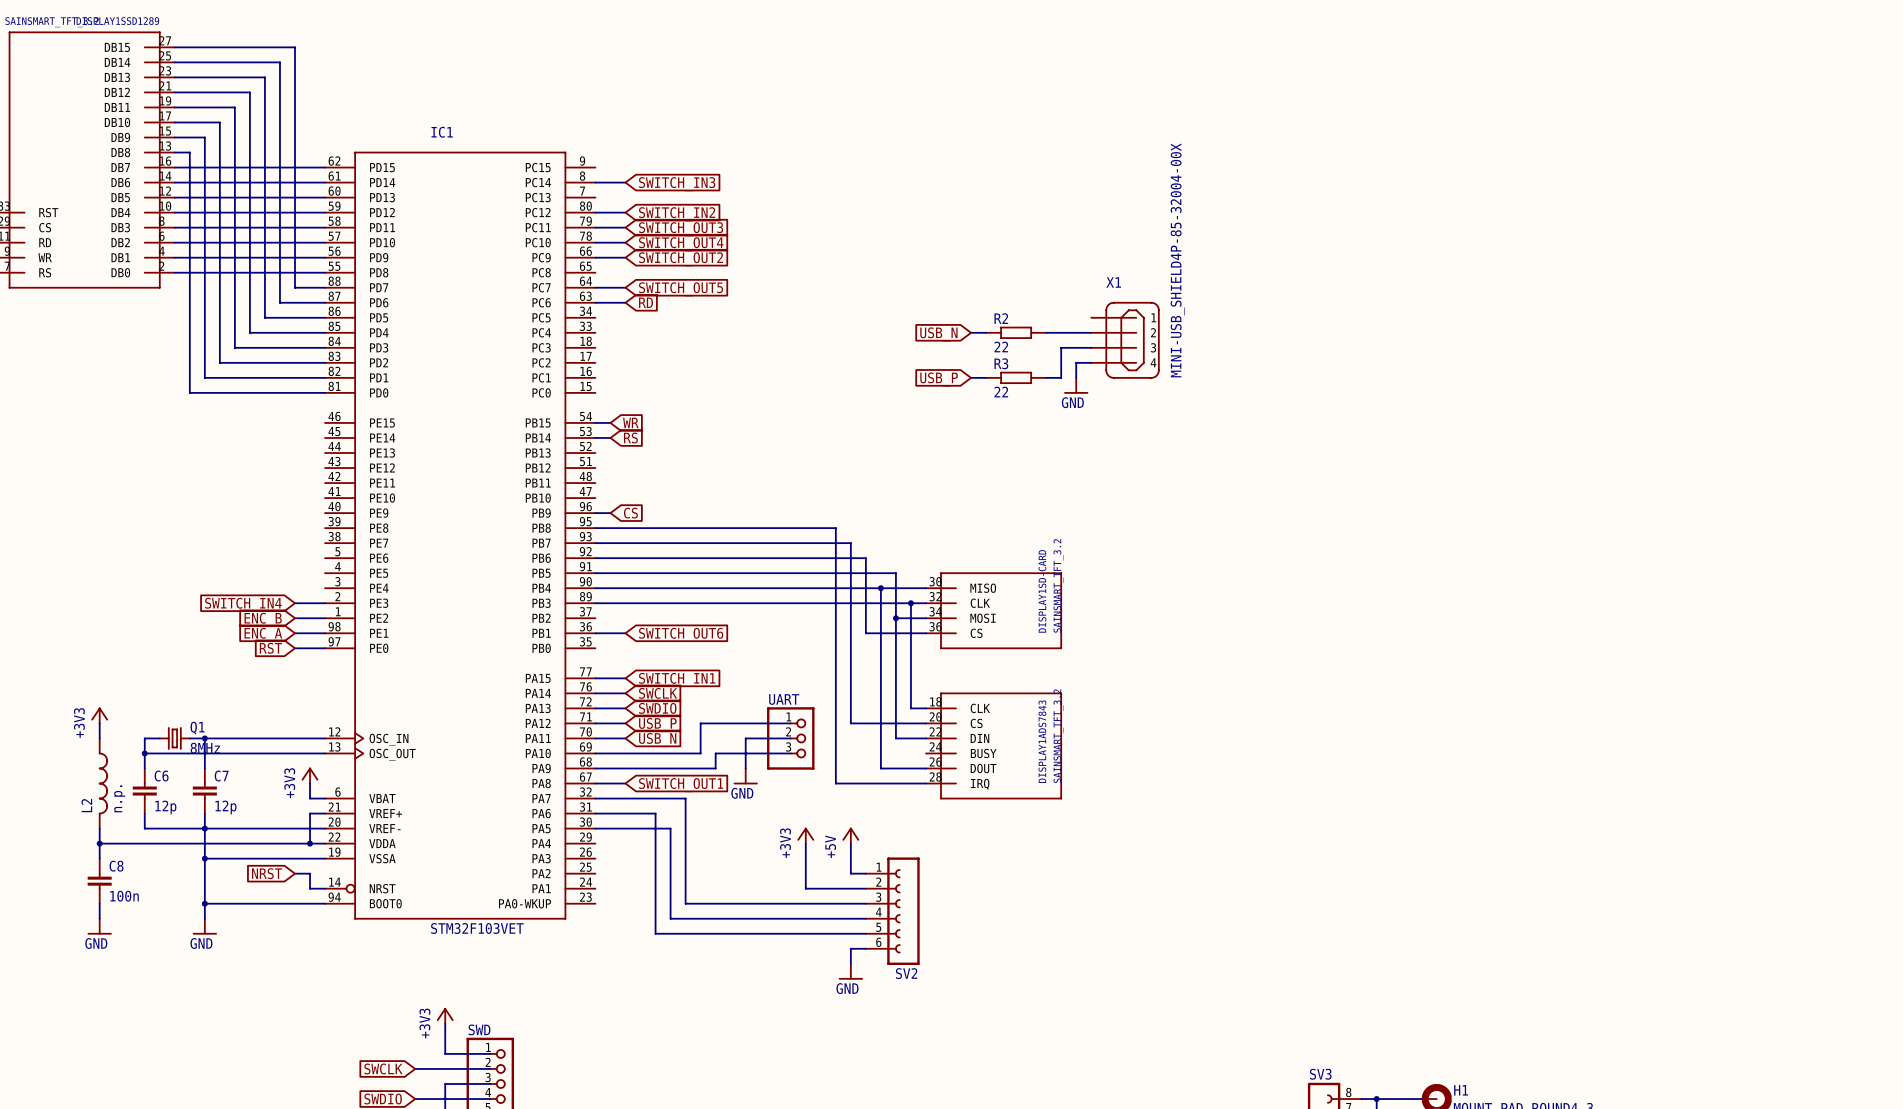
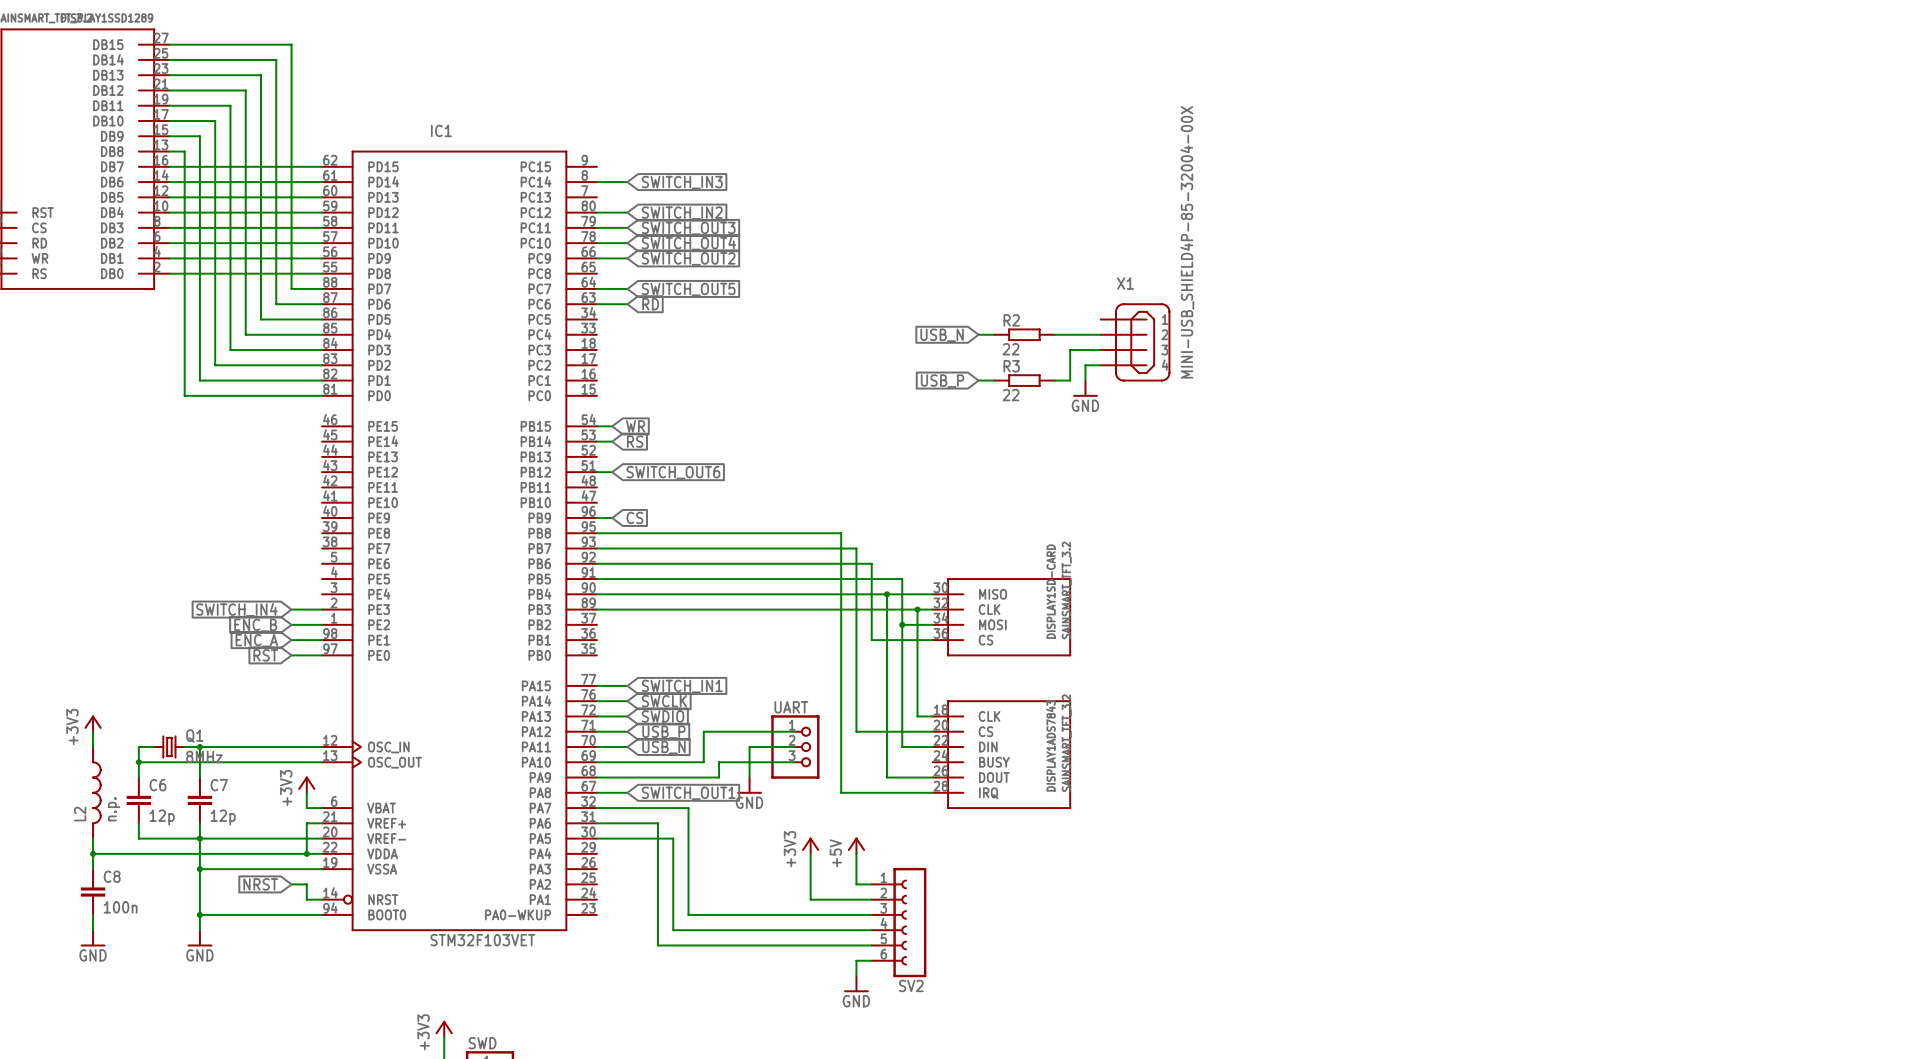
wire: none -> (596, 472) (612, 472)
global label: none -> SWITCH_OUT6 (673, 472)
wire: (595, 633) (625, 633) -> none
global label: SWITCH_OUT6 (681, 634) -> none

